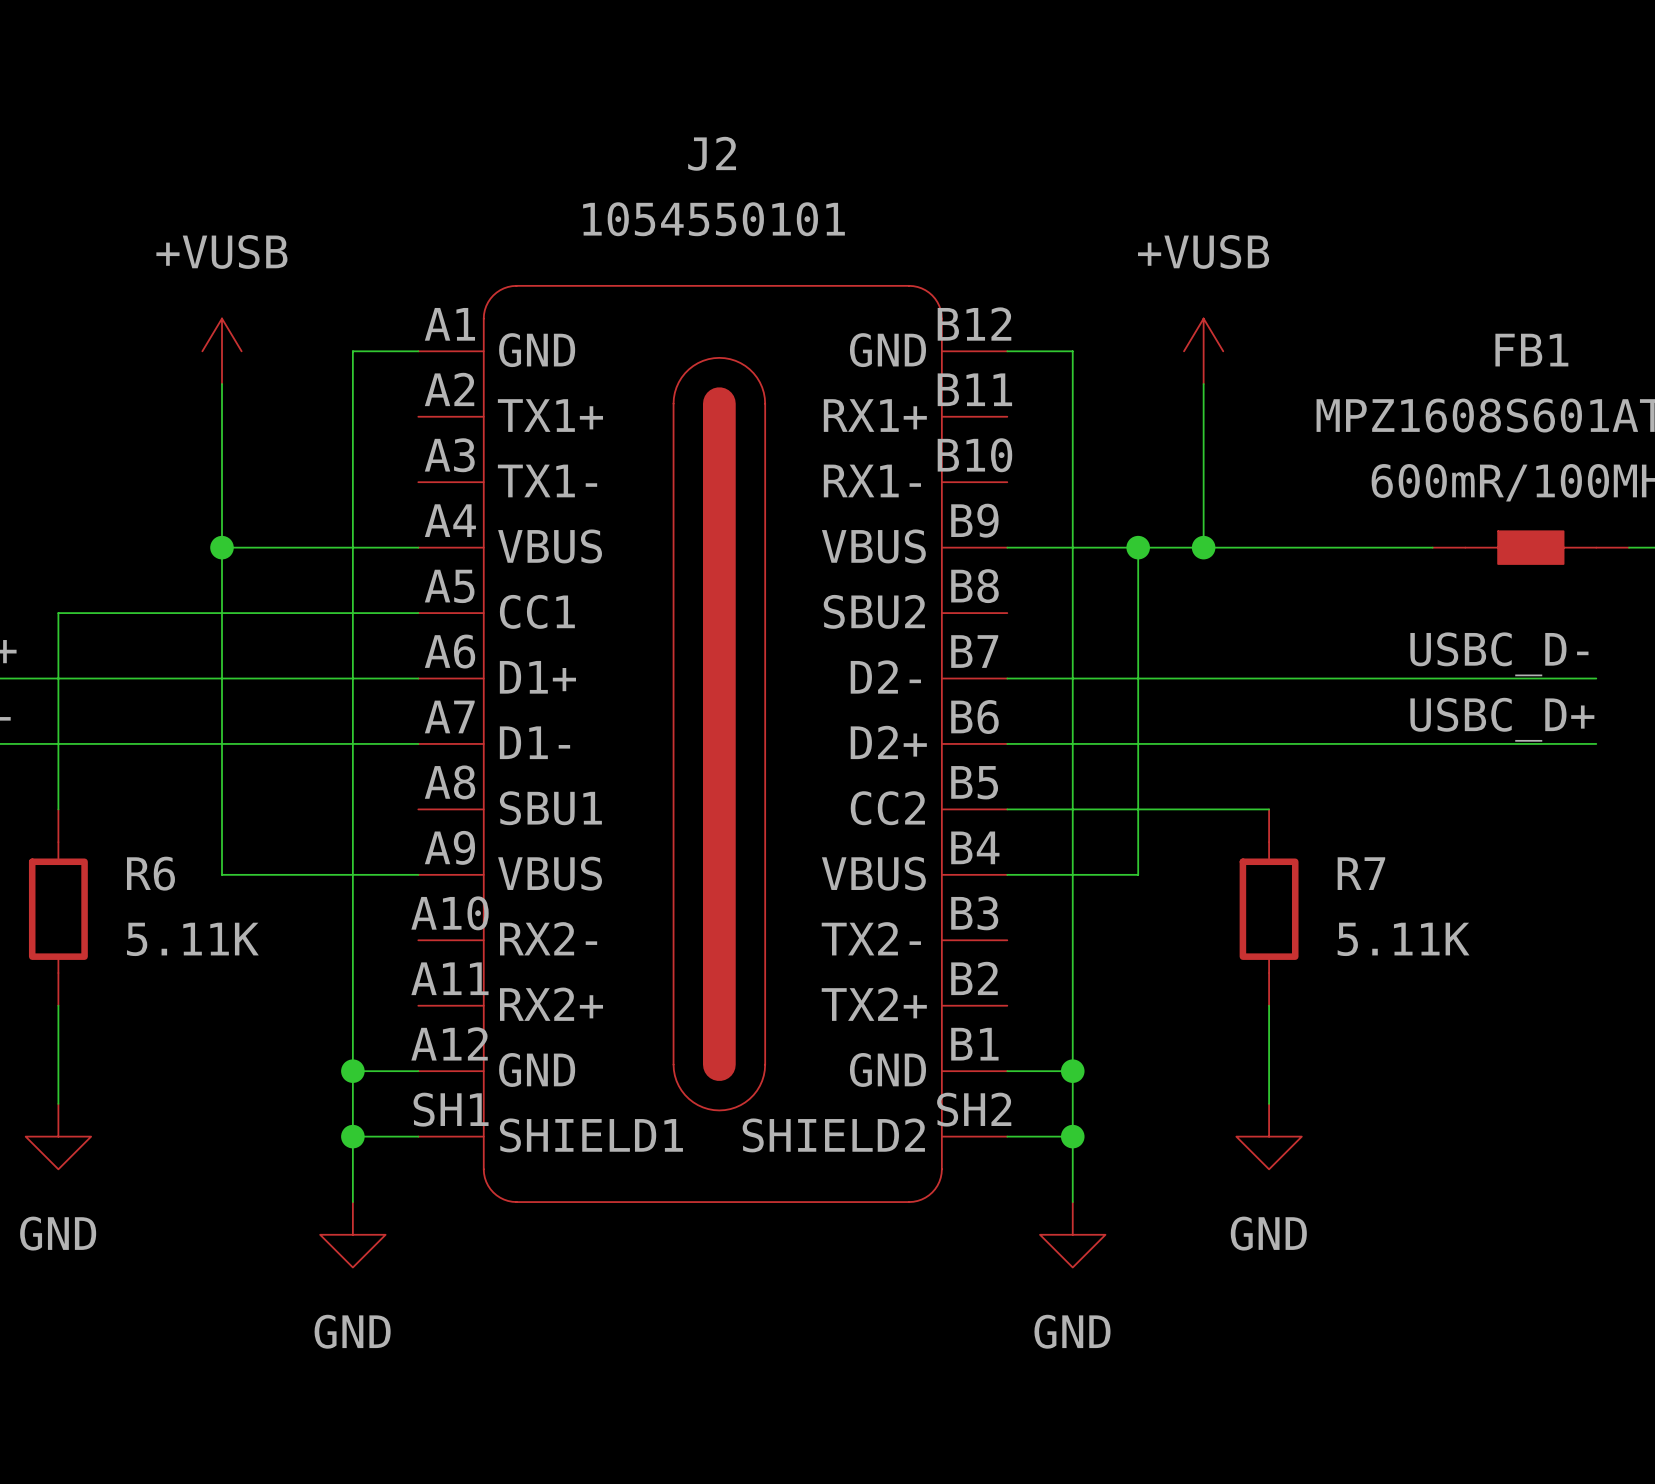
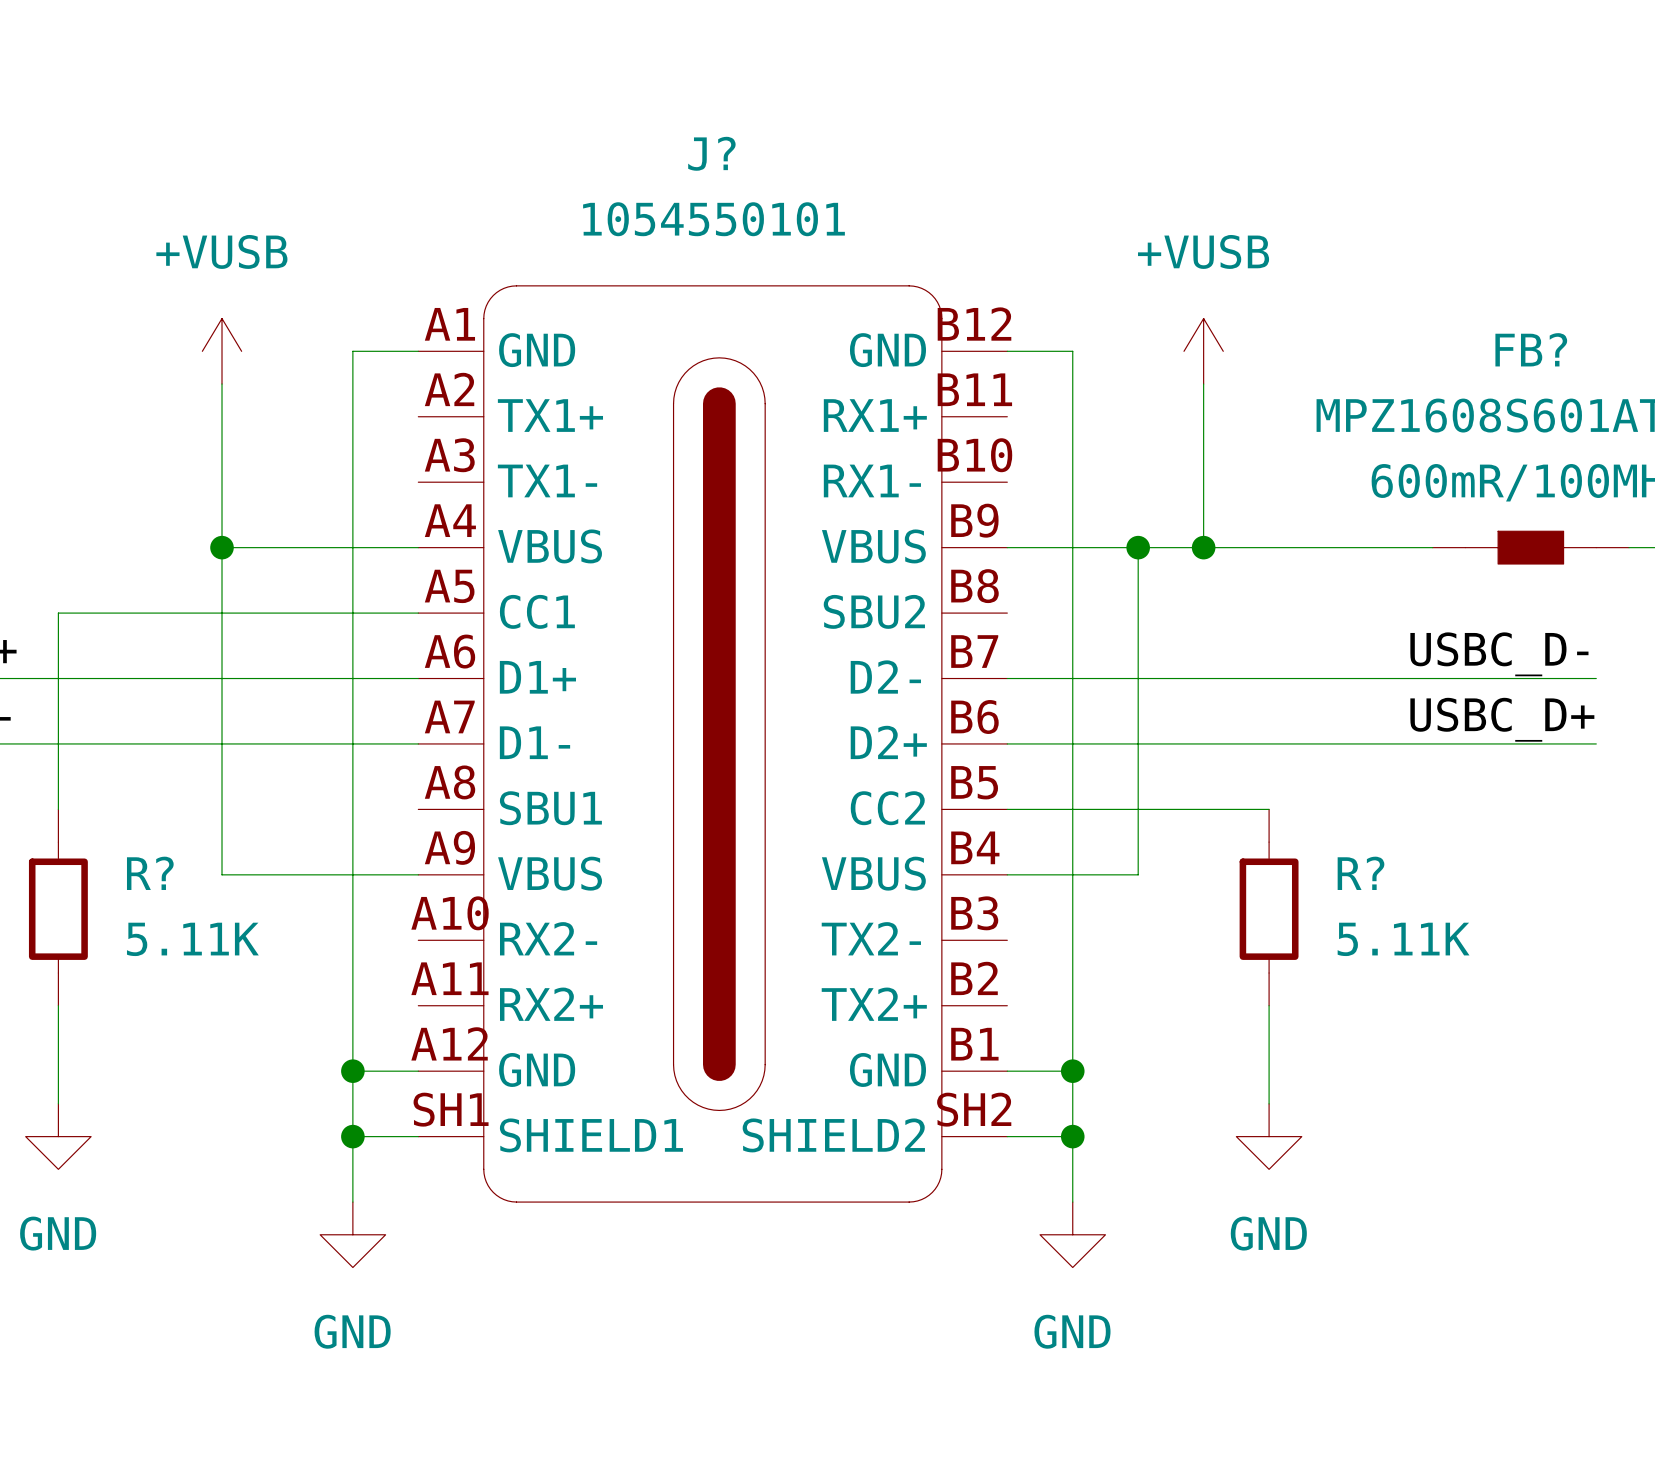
J2 name: J2 (712, 153) -> J? (711, 153)
FB1 name: FB1 (1531, 350) -> FB? (1531, 349)
R6 name: R6 (150, 873) -> R? (150, 873)
R7 name: R7 (1361, 873) -> R? (1360, 873)

